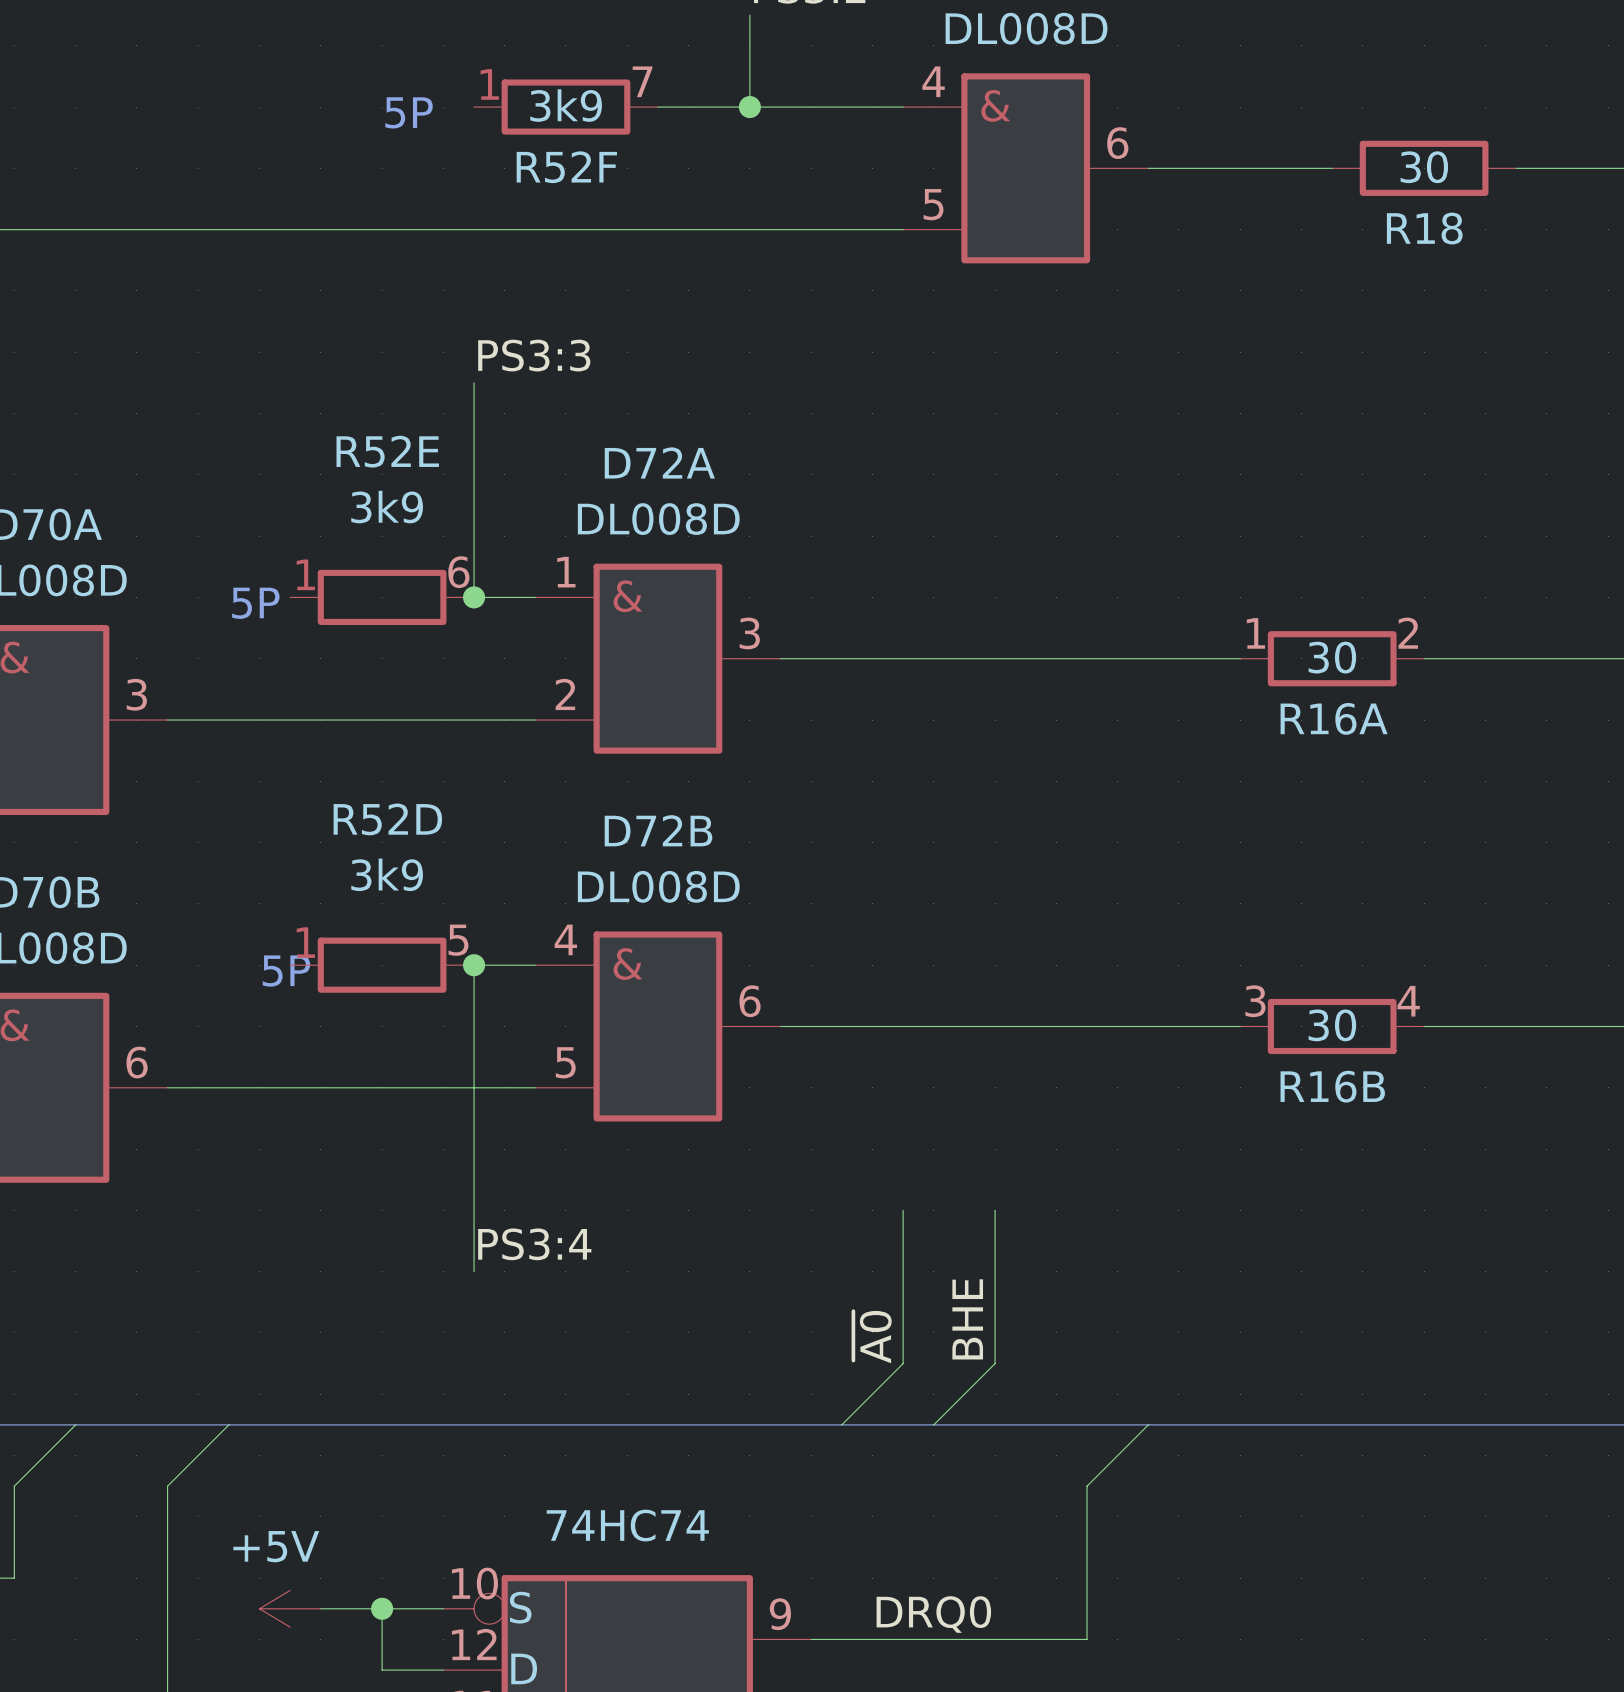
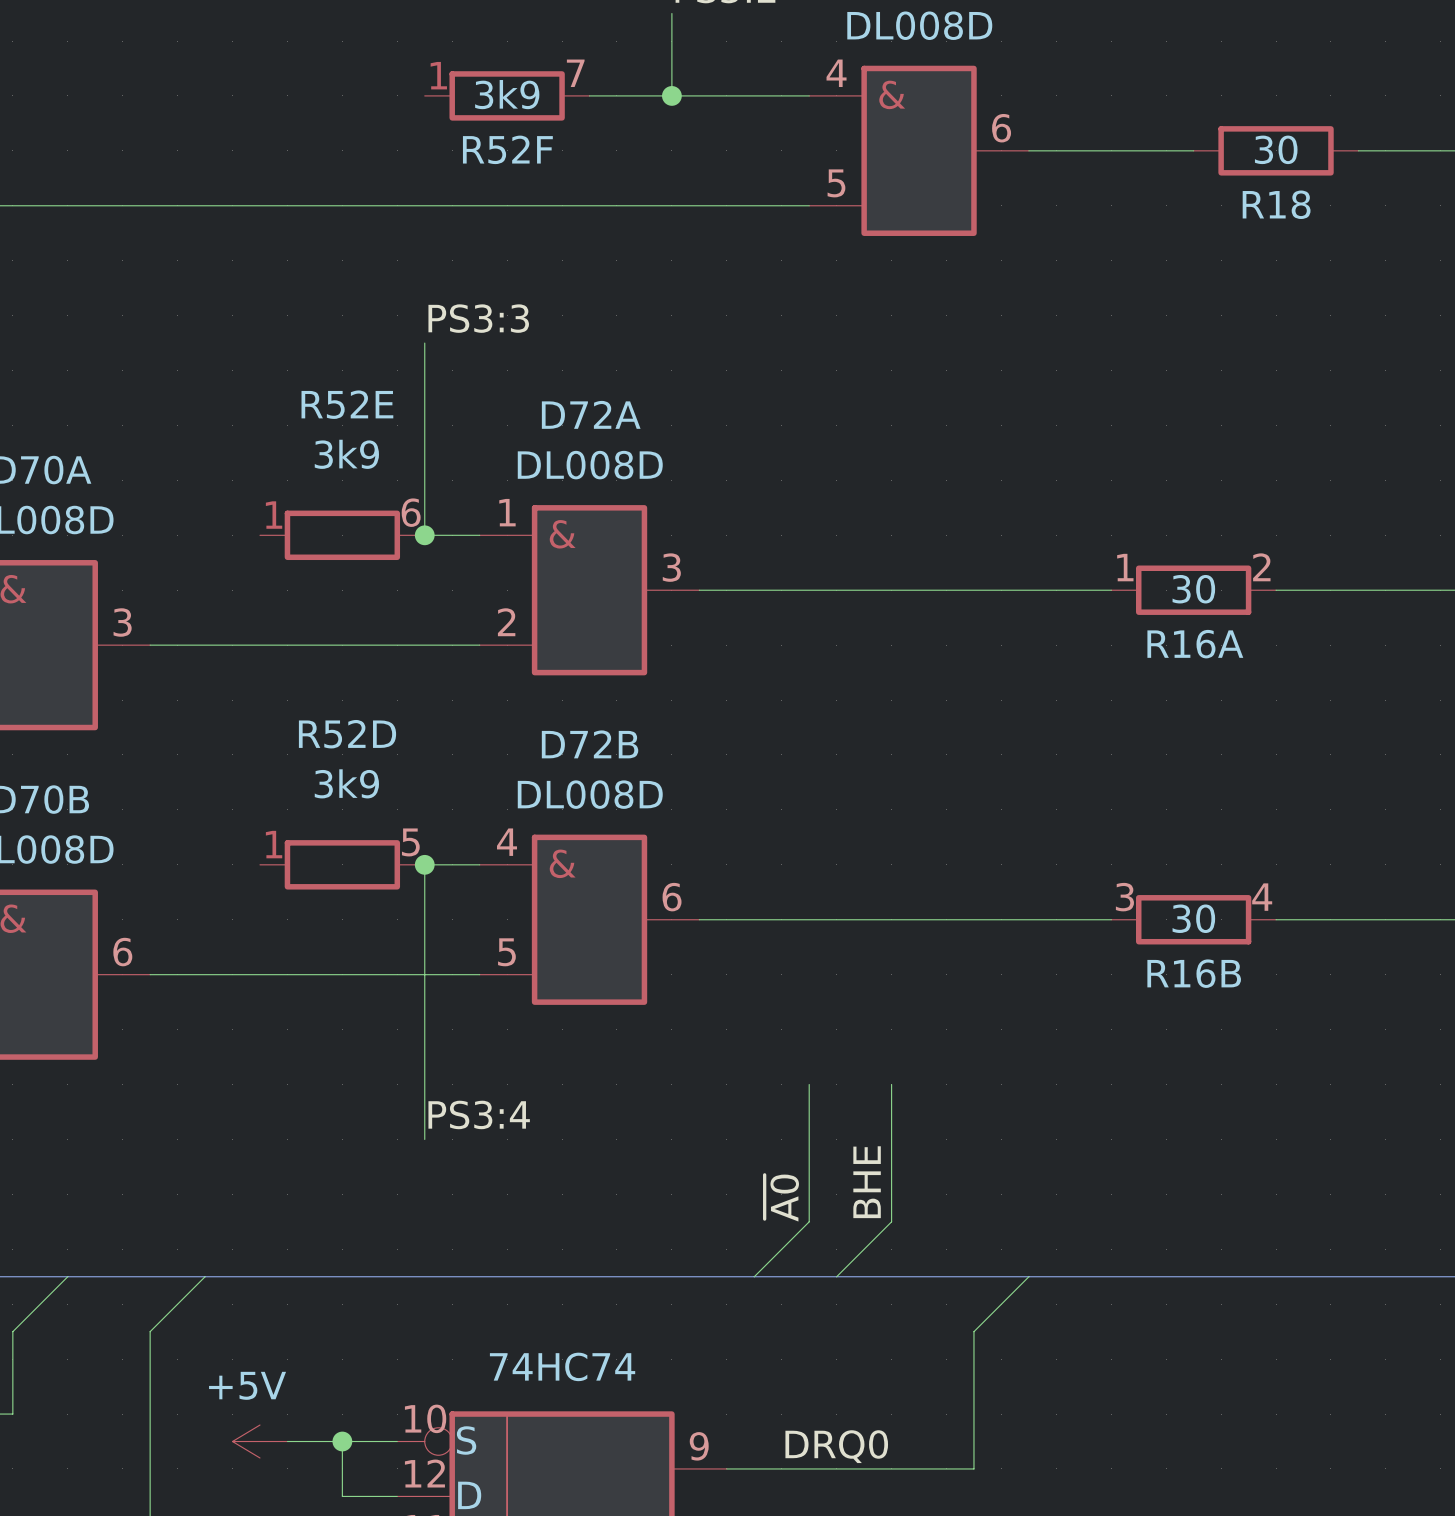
text: 5P (409, 112) -> none
text: 5P (255, 603) -> none
text: 5P (286, 971) -> none

